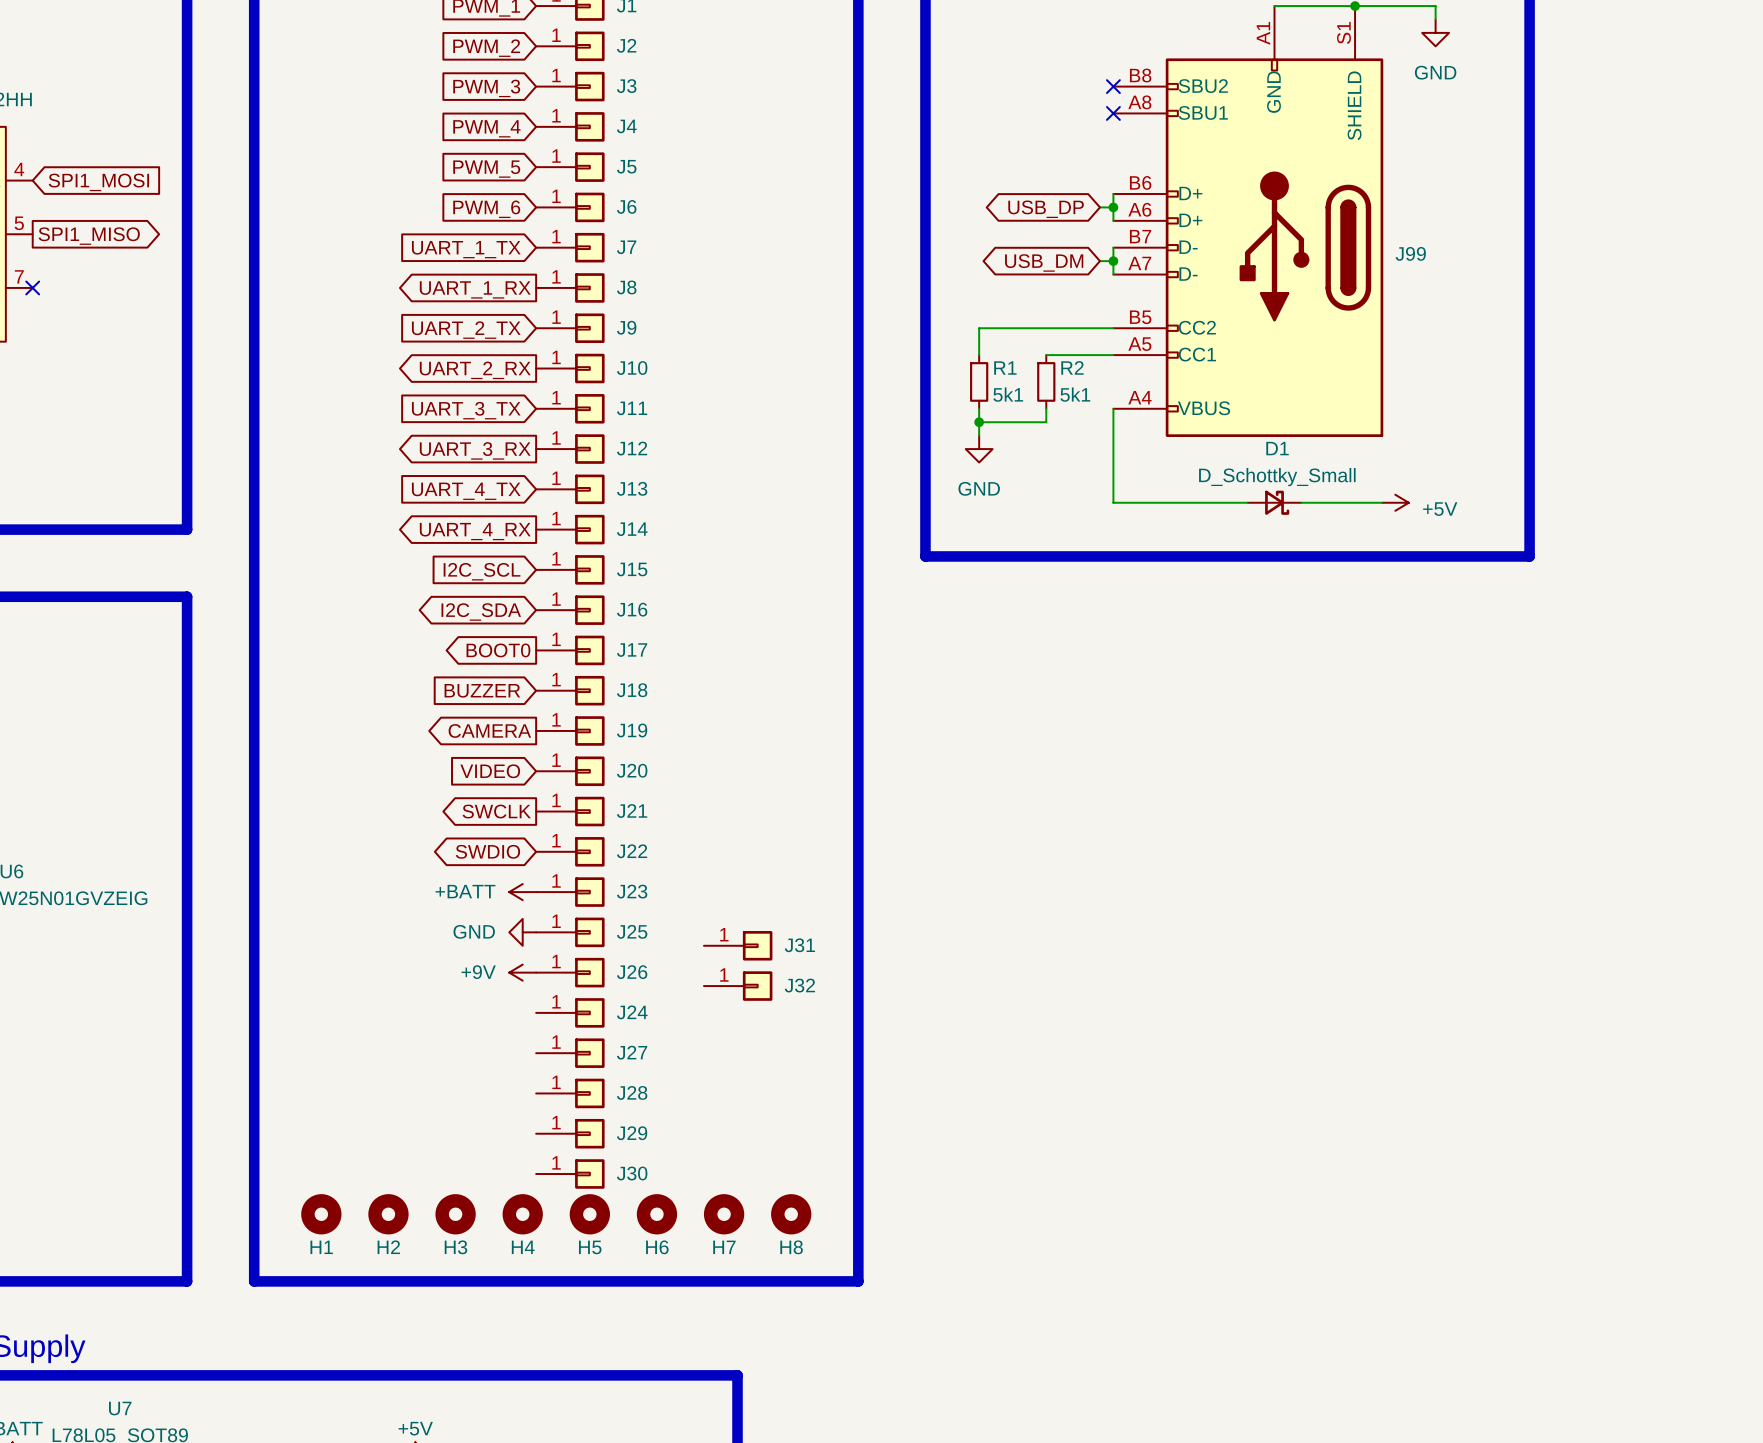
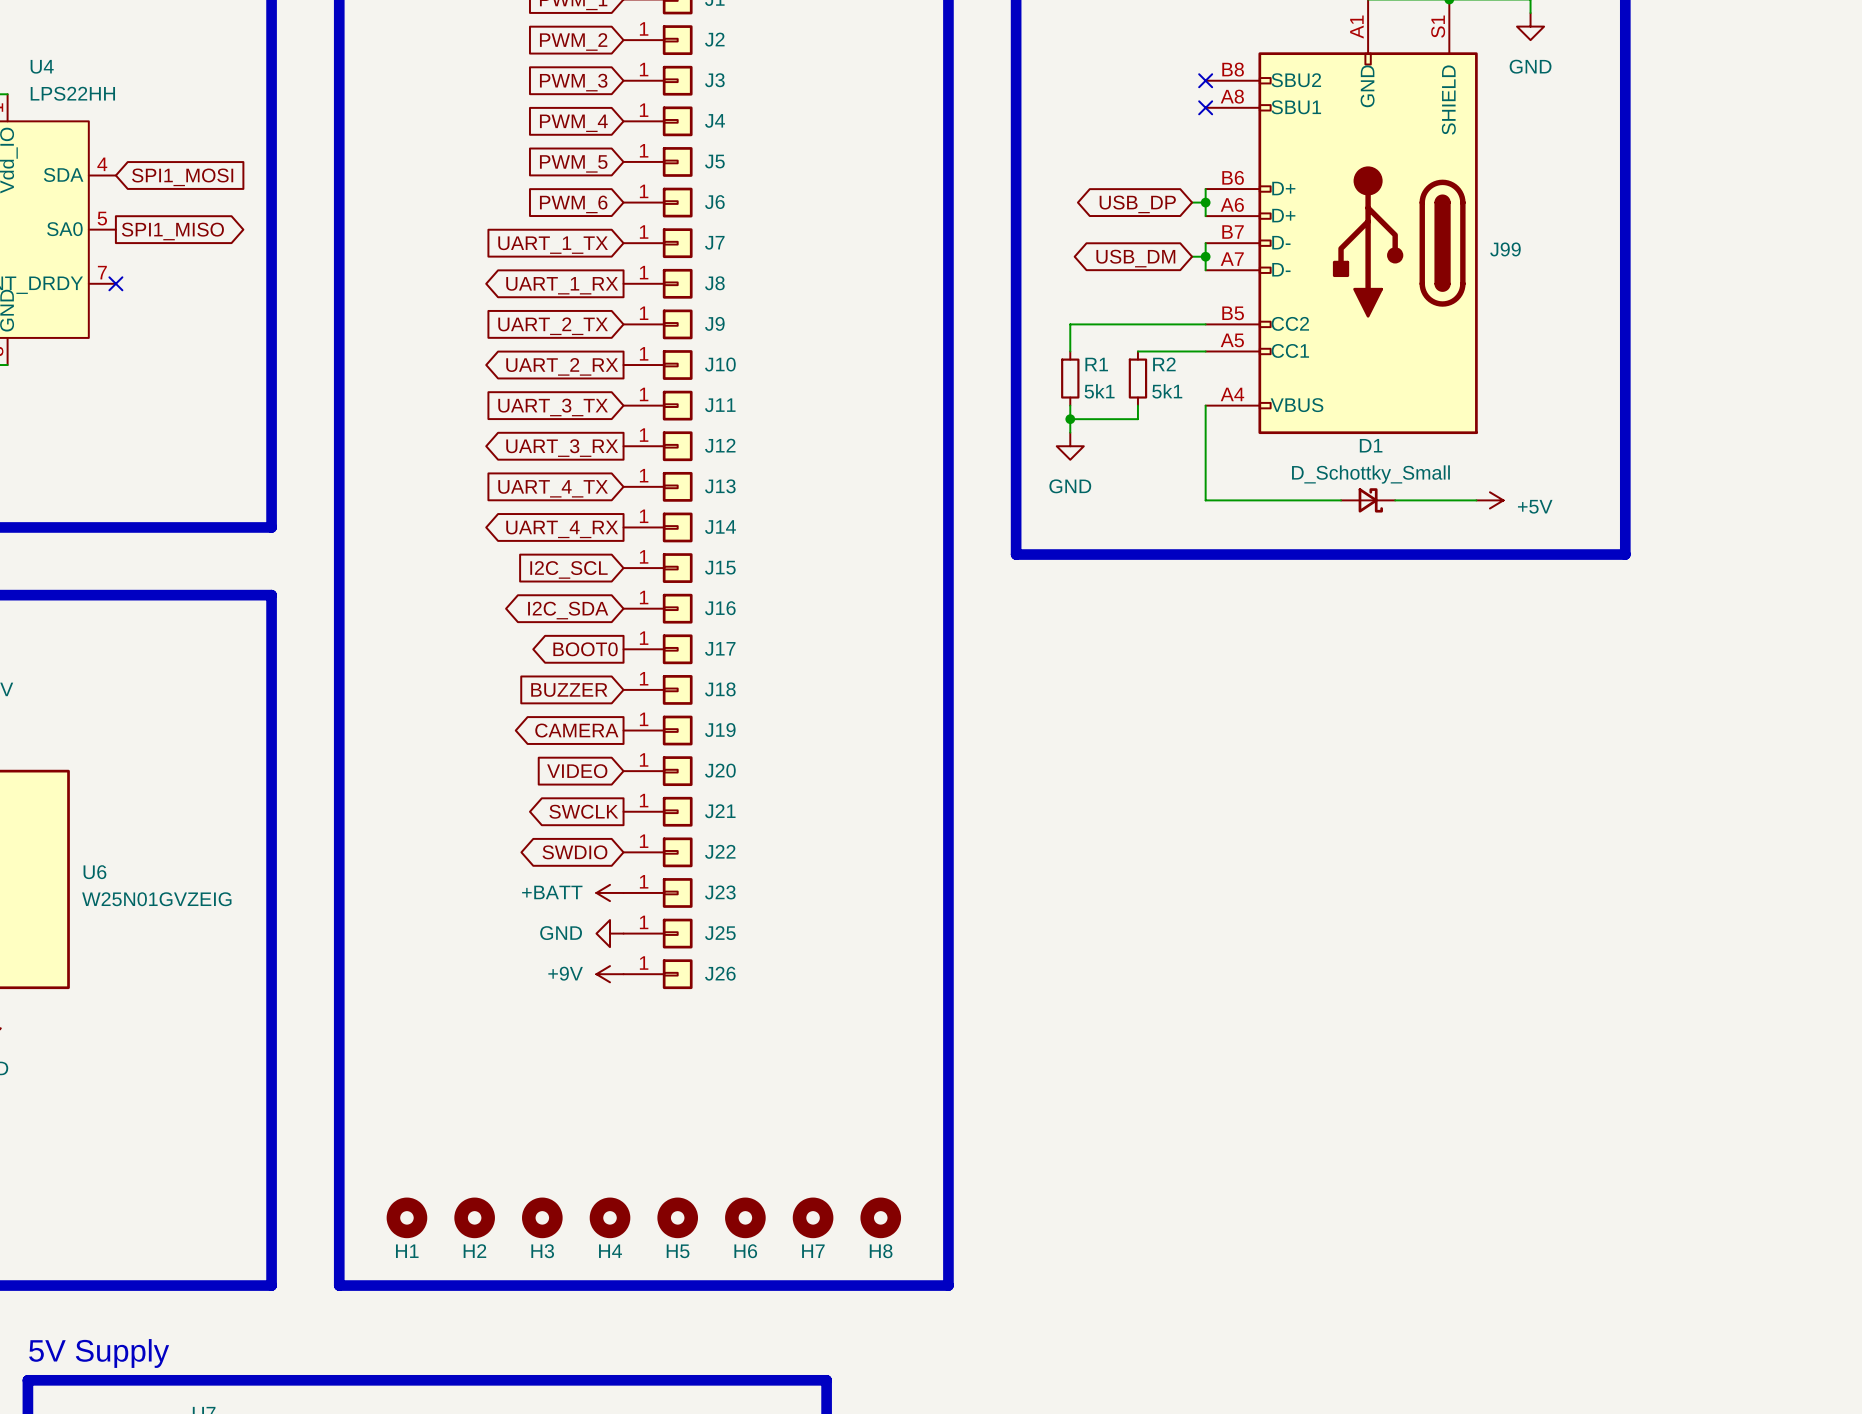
J31: (738, 945) -> none
J32: (738, 986) -> none
J24: (570, 1012) -> none
J27: (570, 1053) -> none
J28: (570, 1093) -> none
J29: (570, 1133) -> none
J30: (570, 1174) -> none

